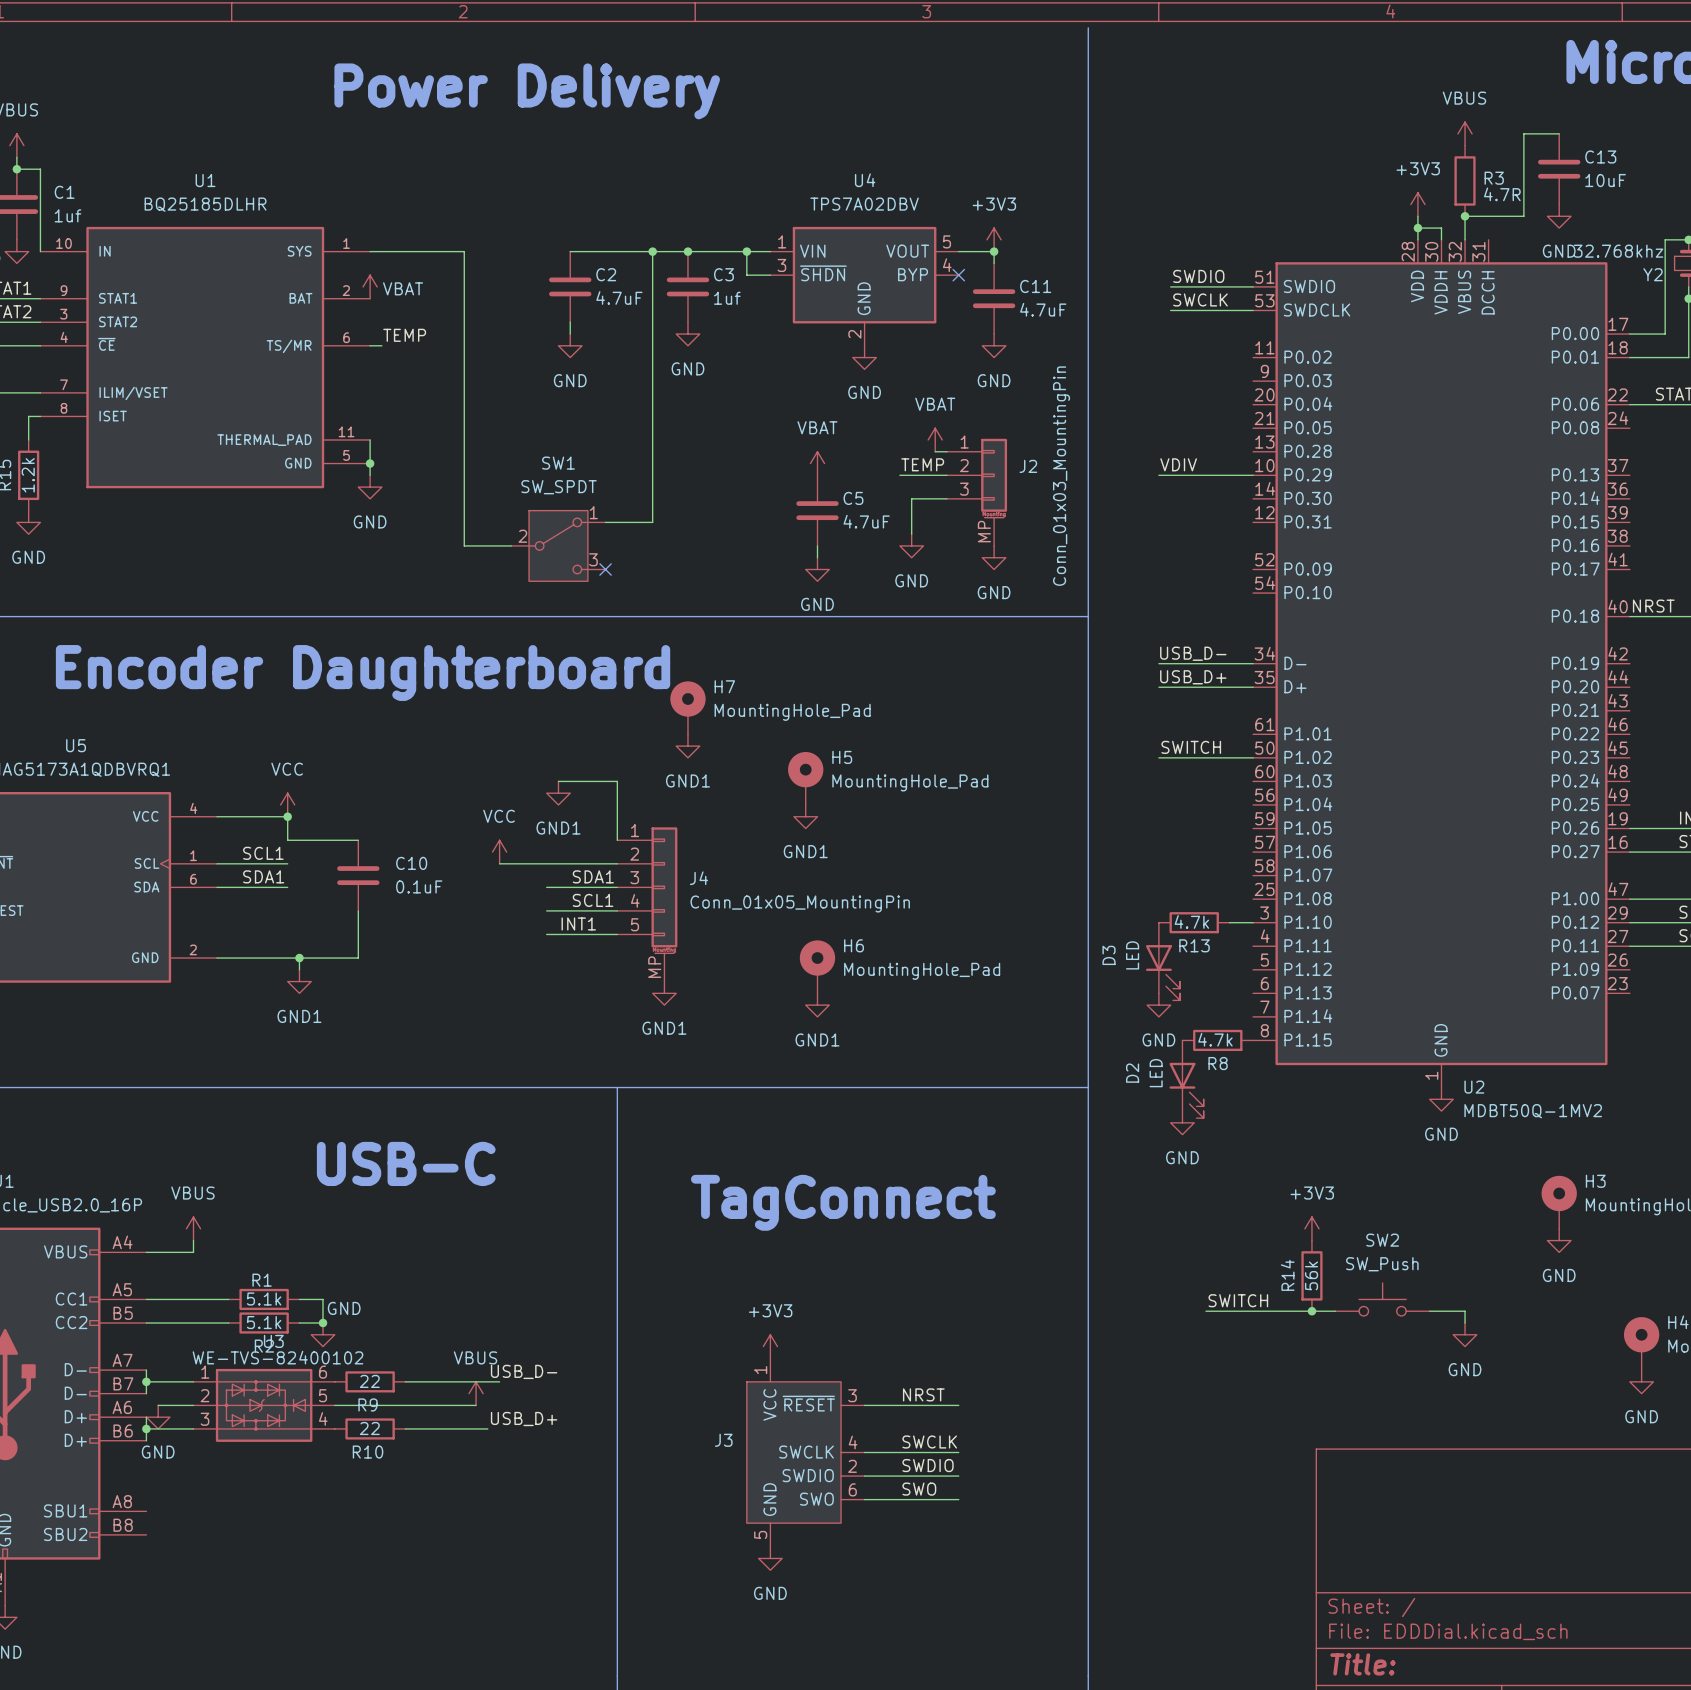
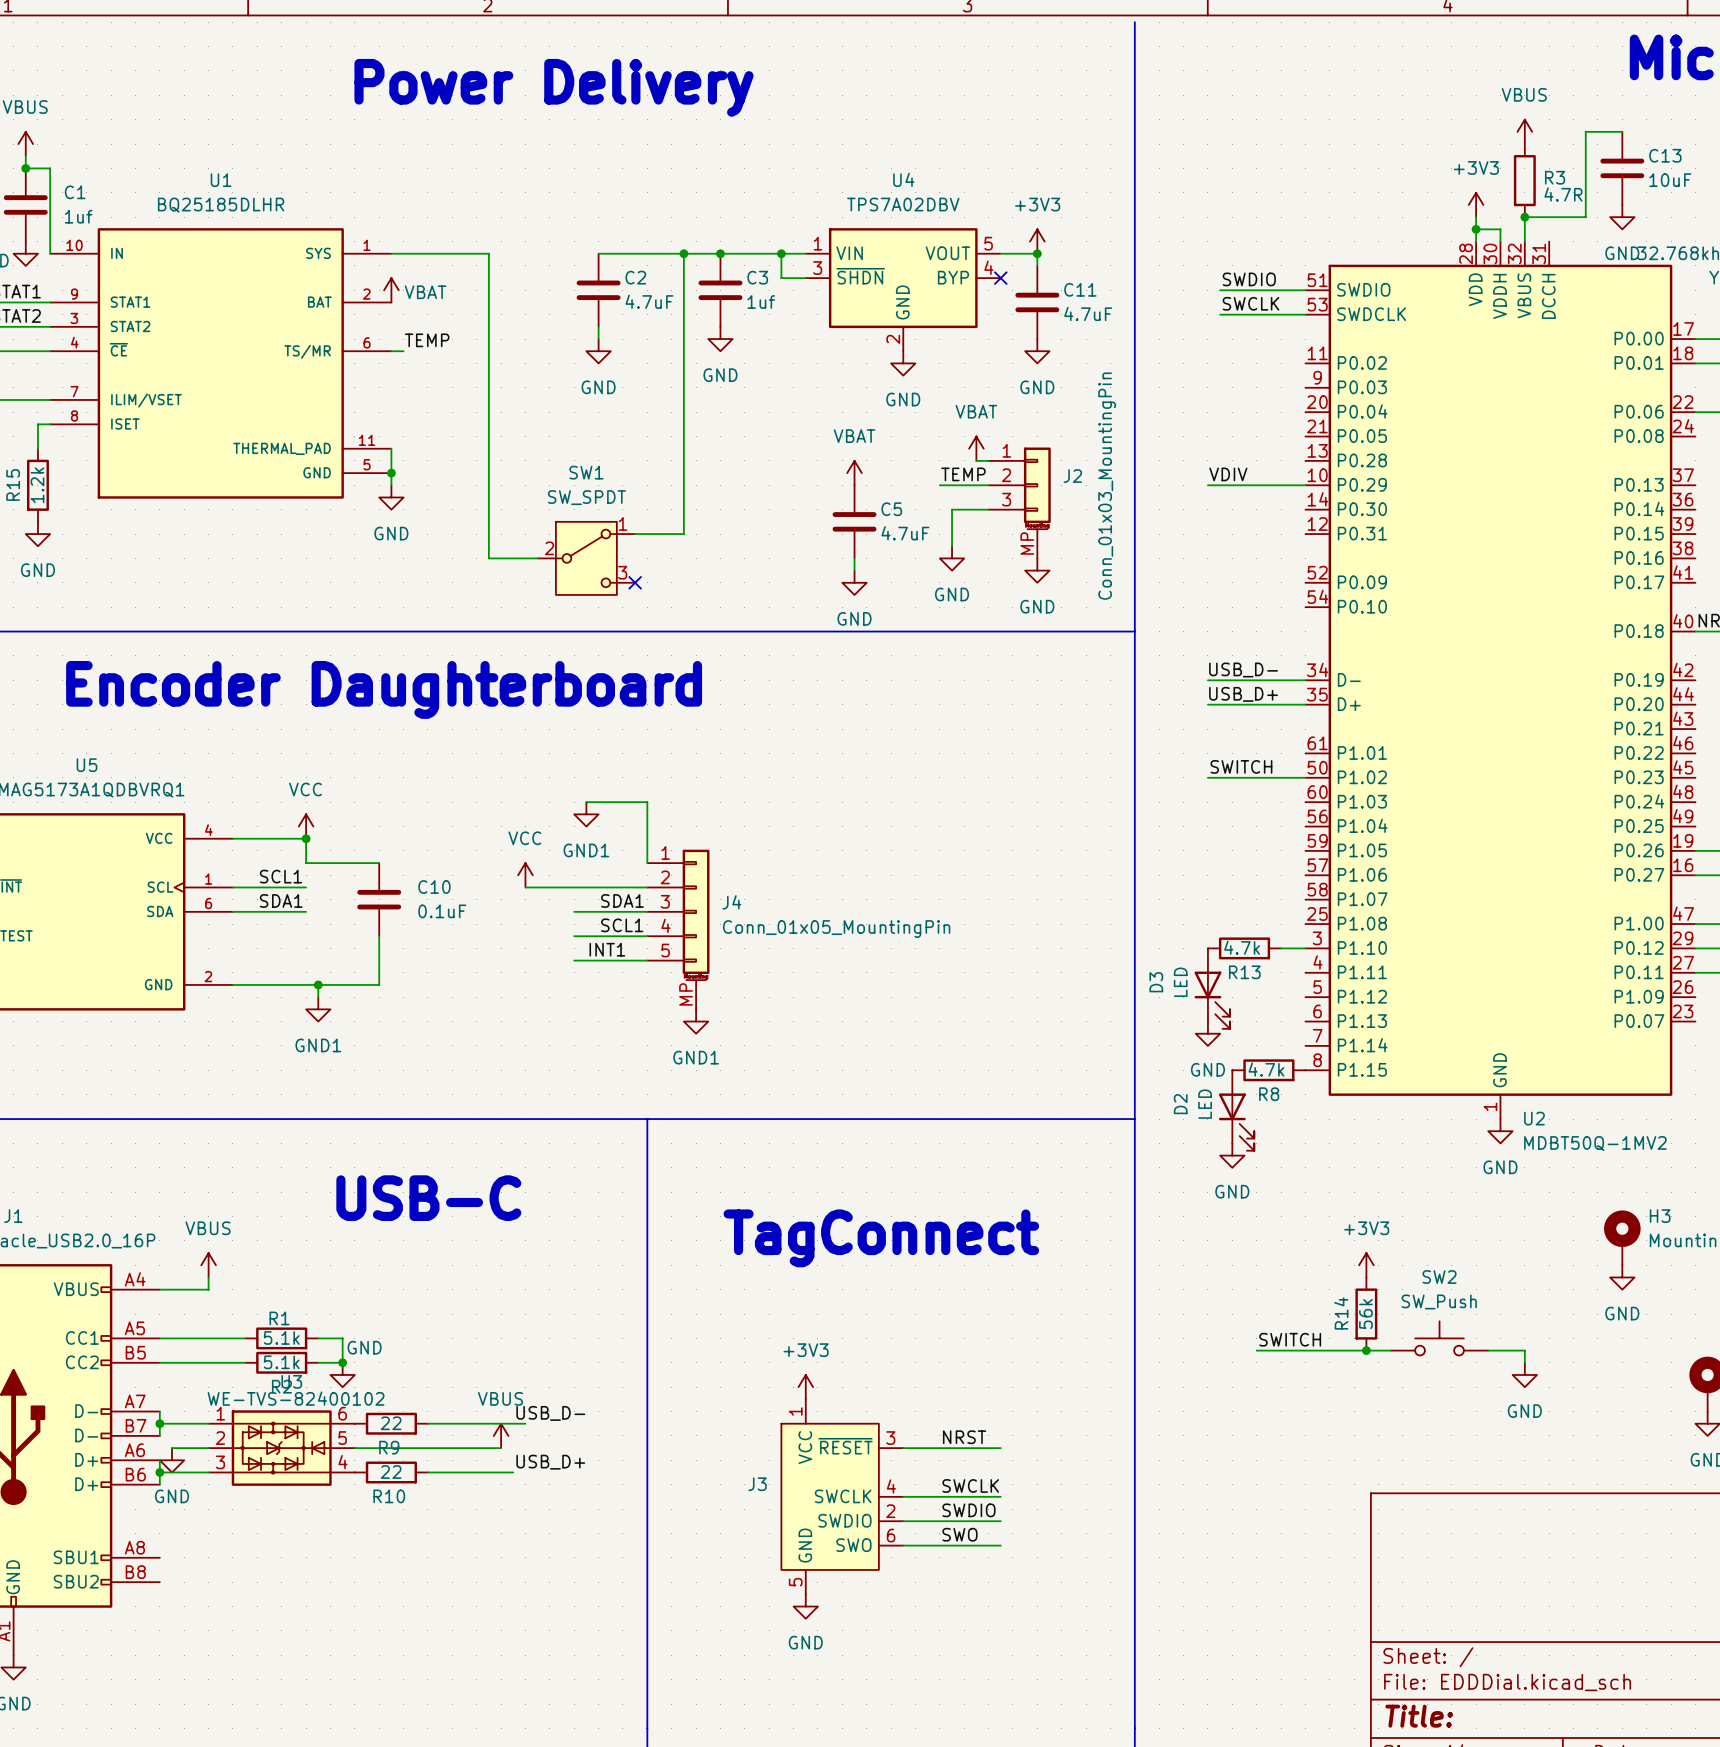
H7: MountingHole_Pad (687, 707) -> none
power symbol: GND1 (687, 746) -> none
H5: MountingHole_Pad (805, 778) -> none
power symbol: GND1 (805, 816) -> none
H6: MountingHole_Pad (817, 966) -> none
power symbol: GND1 (817, 1005) -> none

